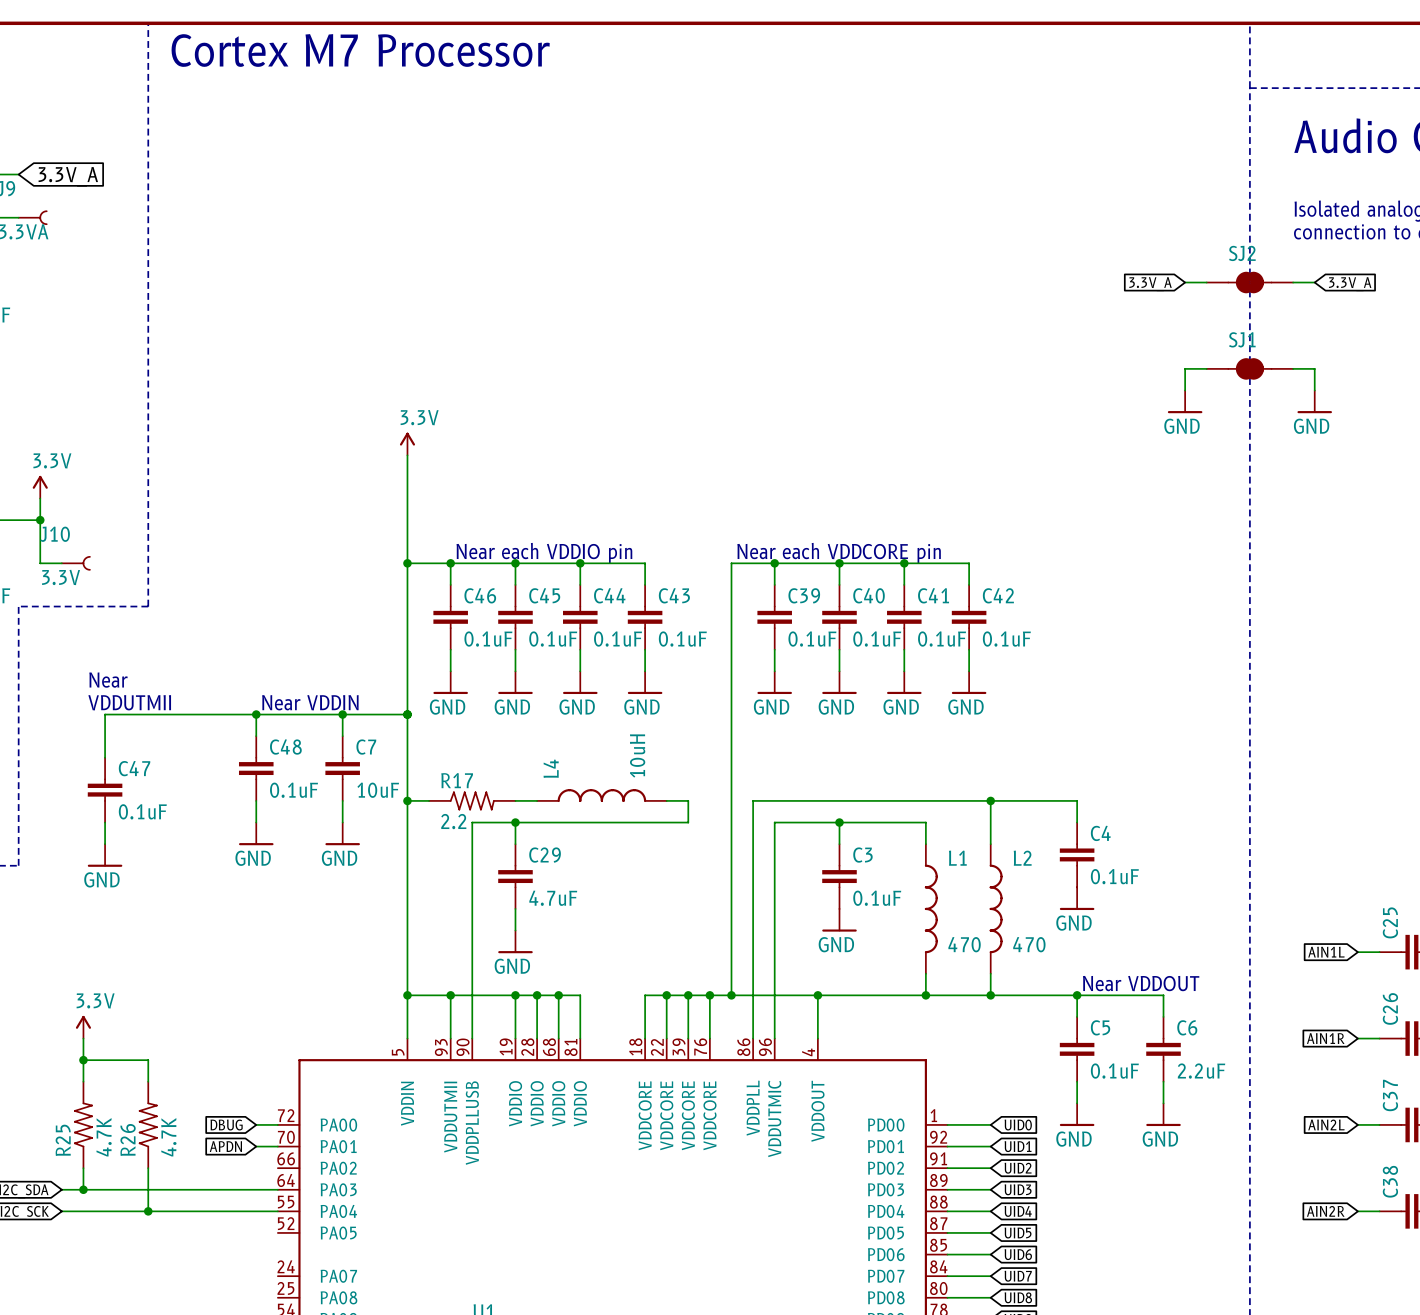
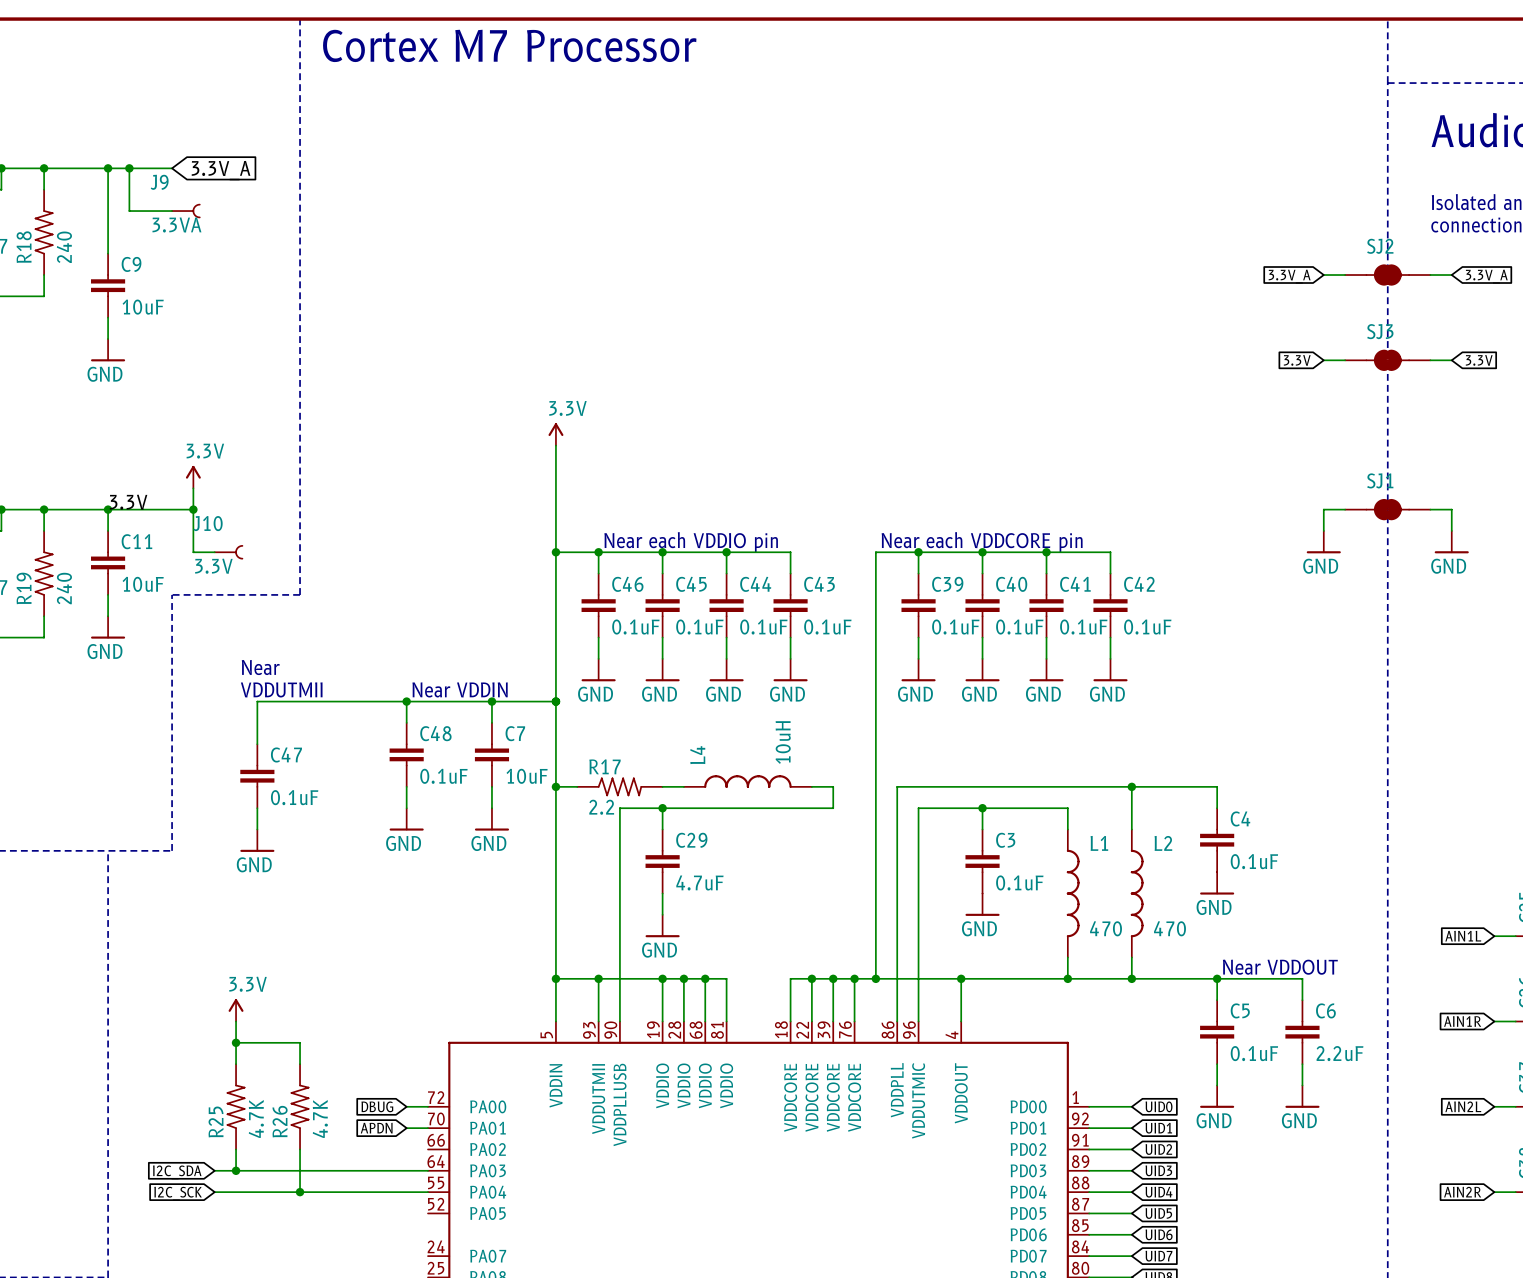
SJ1 name: SJ1 (1242, 339) -> SJ3 (1380, 331)
global label: none -> 3.3V (1297, 360)
wire: (1185, 368) (1185, 390) -> none
wire: (1314, 368) (1314, 390) -> none
global label: none -> 3.3V (1479, 360)
power symbol: GND (1185, 401) -> none
power symbol: GND (1314, 401) -> none
wire: none -> (1345, 509) (1323, 509) (1323, 530)
SJ1: none -> (1387, 509)
wire: none -> (1430, 509) (1451, 509) (1451, 530)
power symbol: none -> GND (1323, 542)
power symbol: none -> GND (1451, 542)

